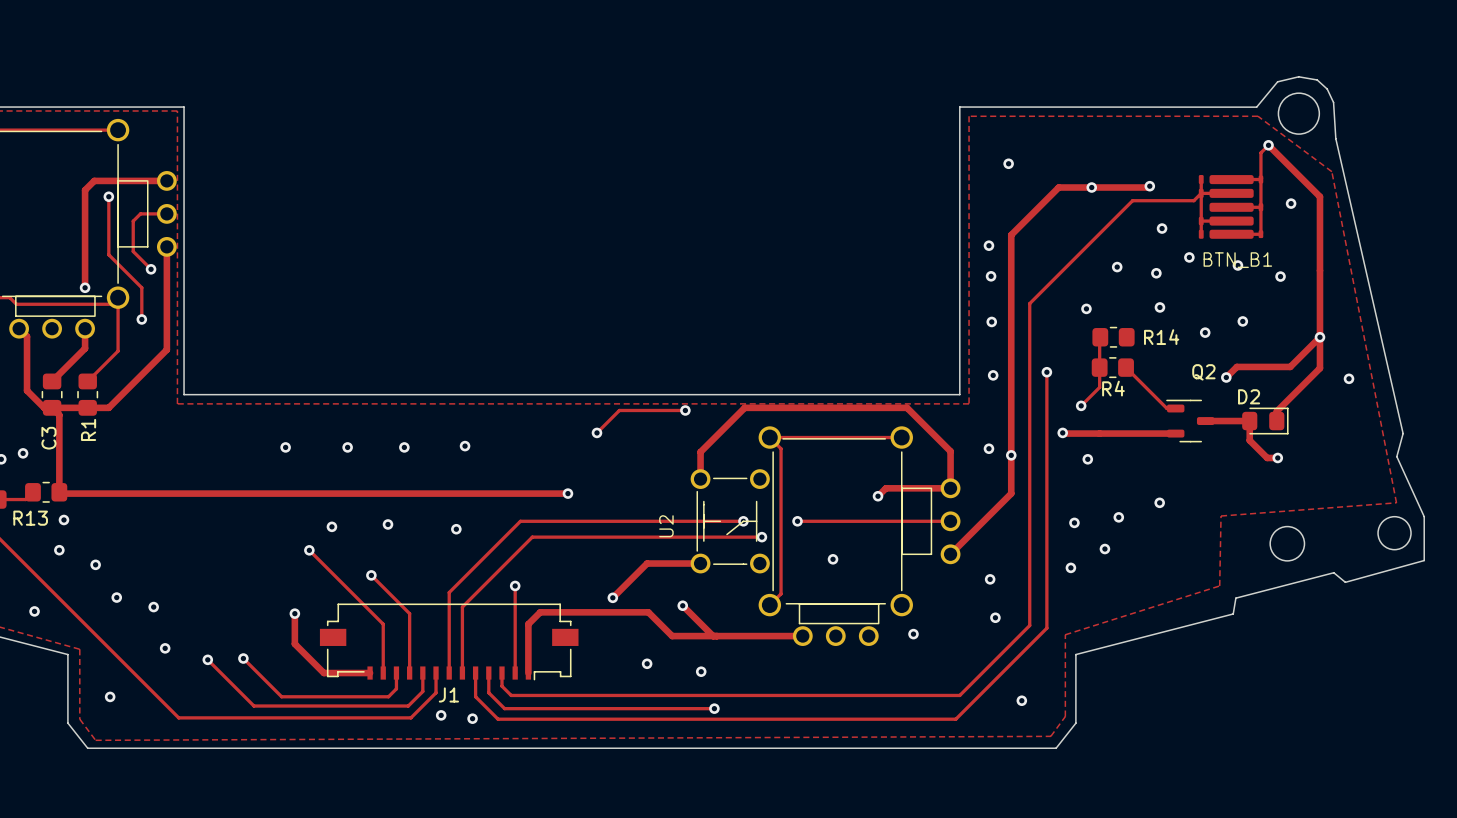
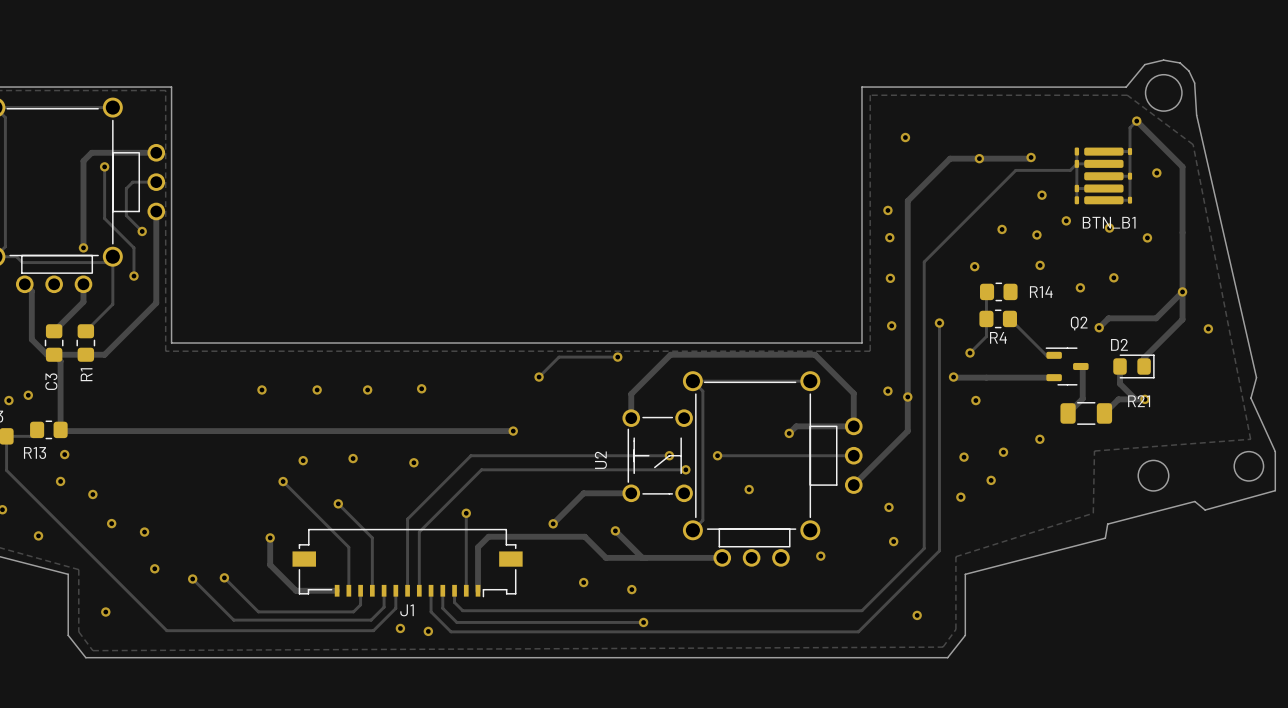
track: (1205, 421) (1249, 421) -> (1080, 366) (1082, 368) (1082, 398) (1068, 413)
track: none -> (1135, 399) (1118, 399) (1104, 413)
R21: none -> (1086, 413)

